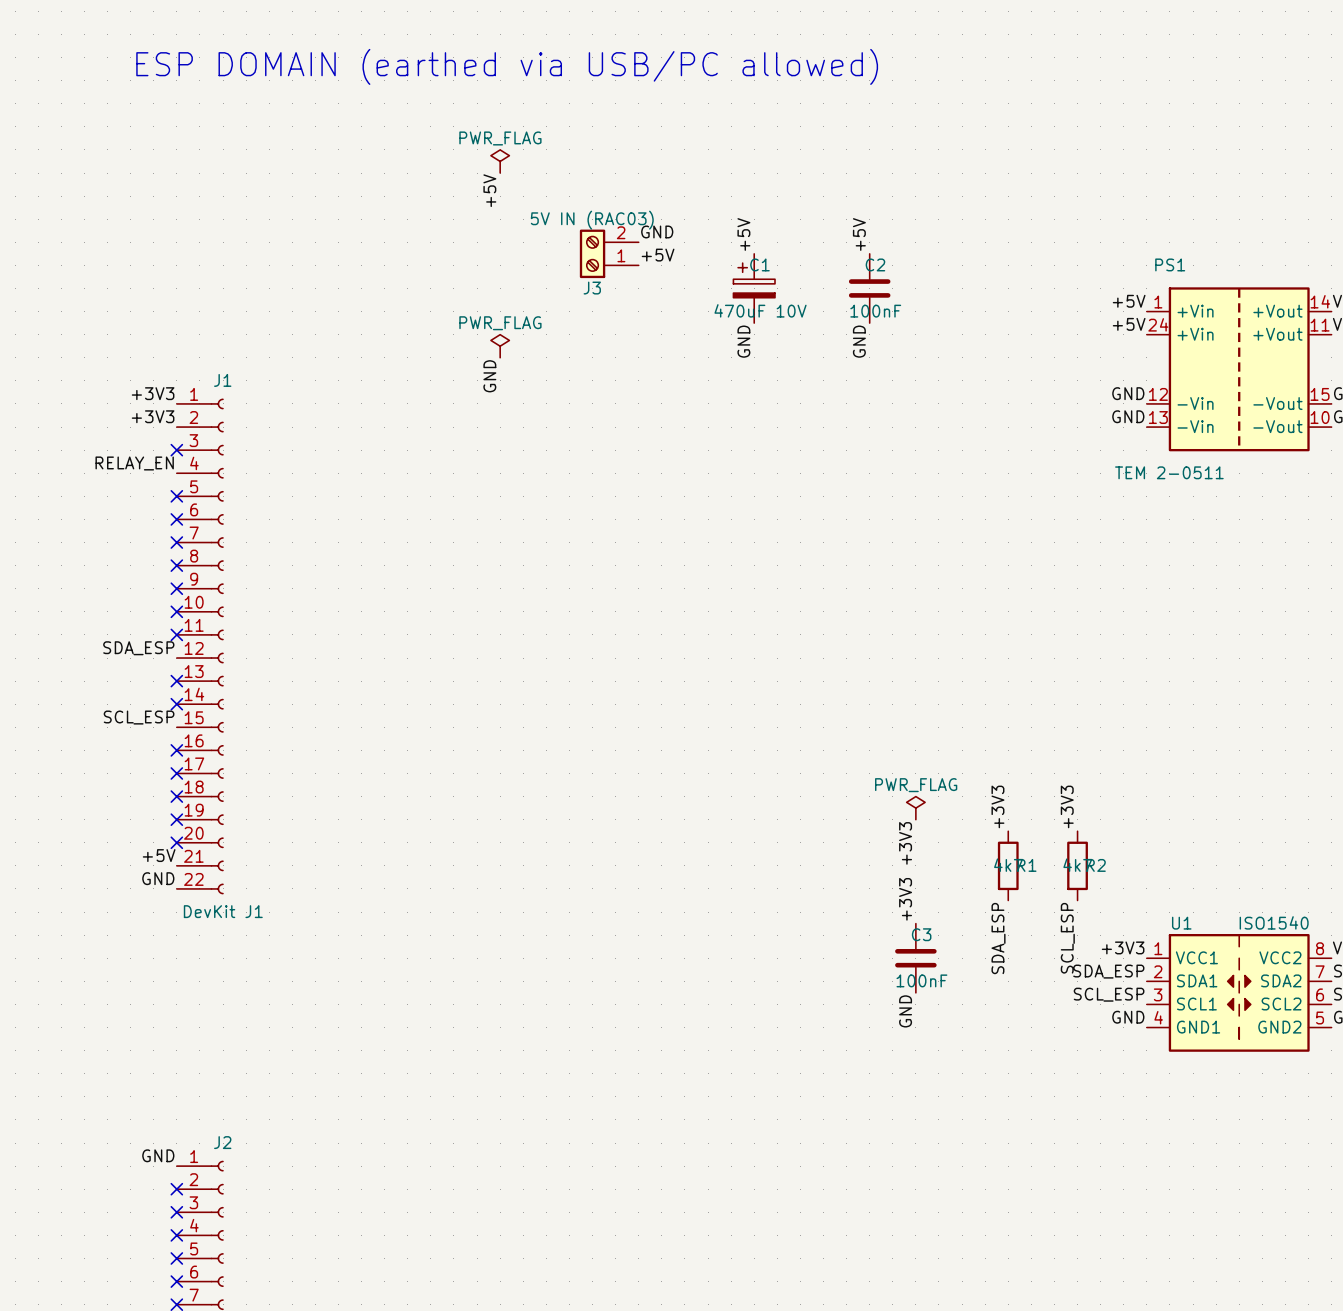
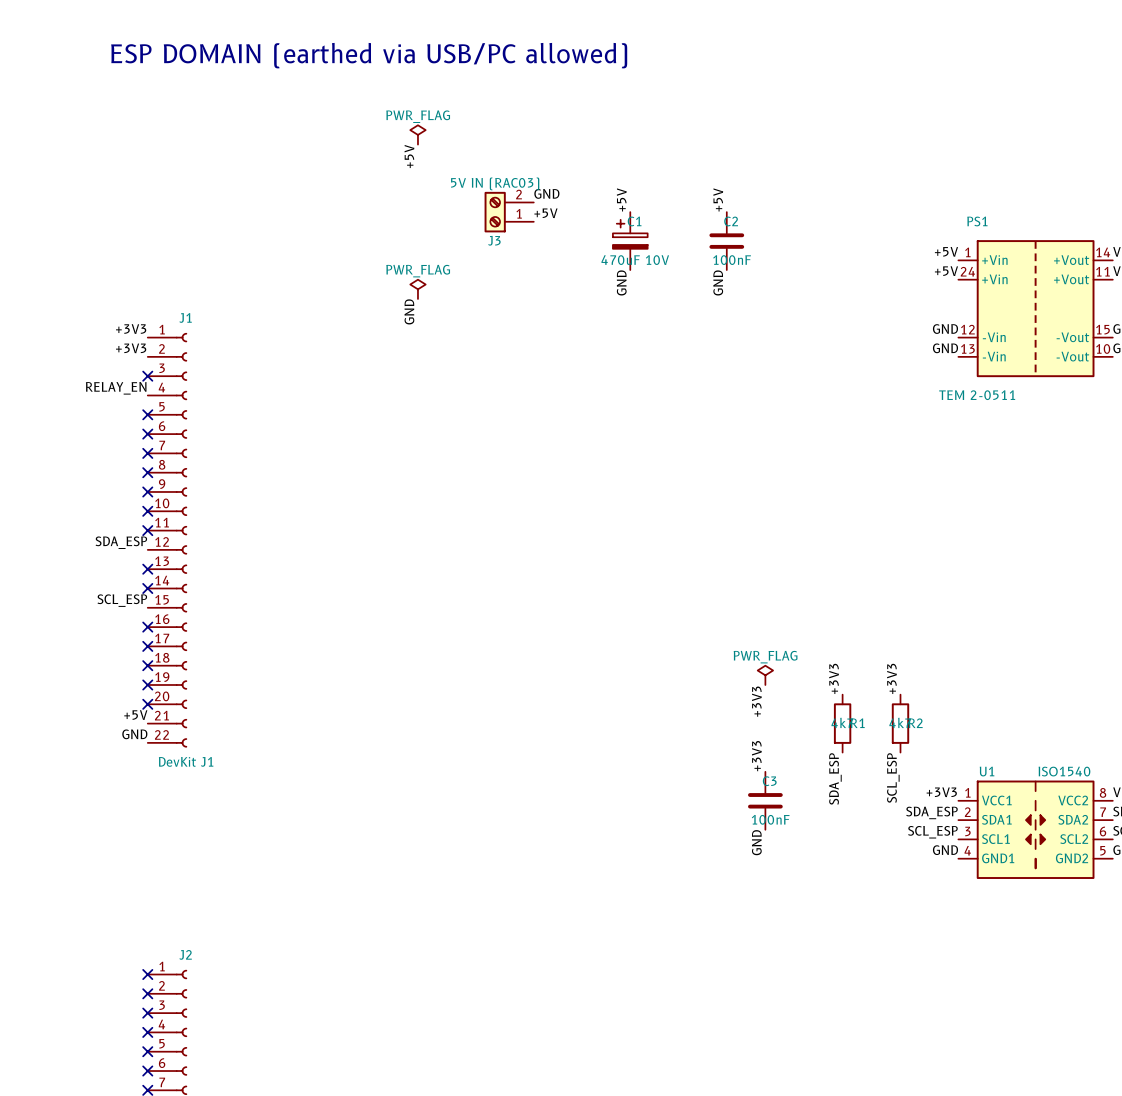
label: GND (158, 1155) -> none
no-connect mark: none -> (147, 974)

